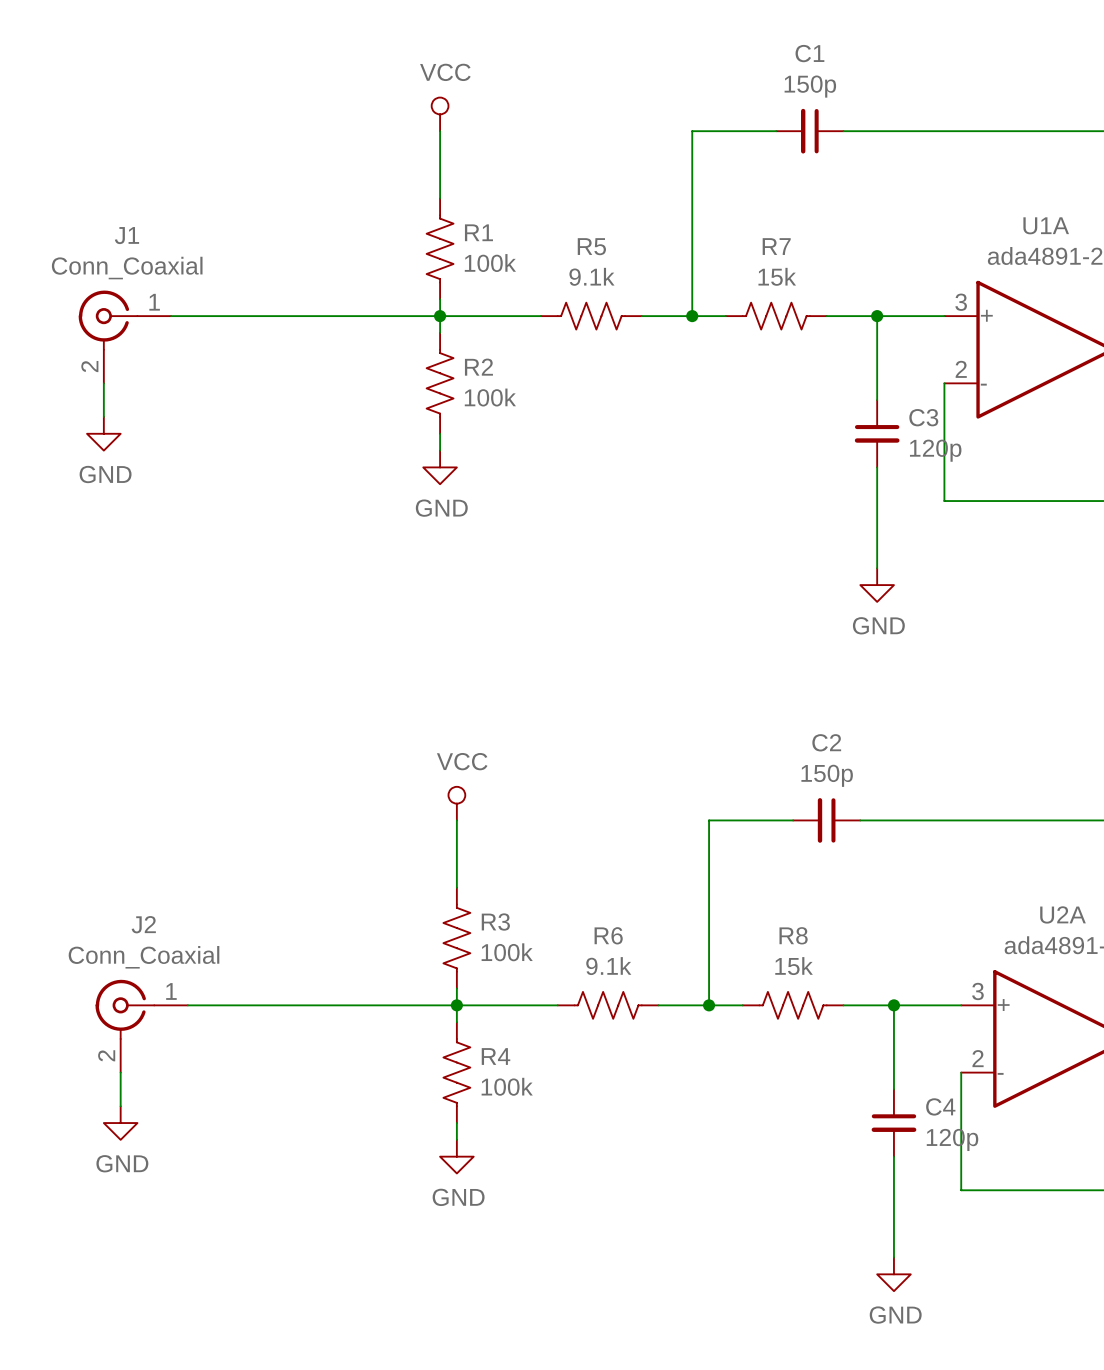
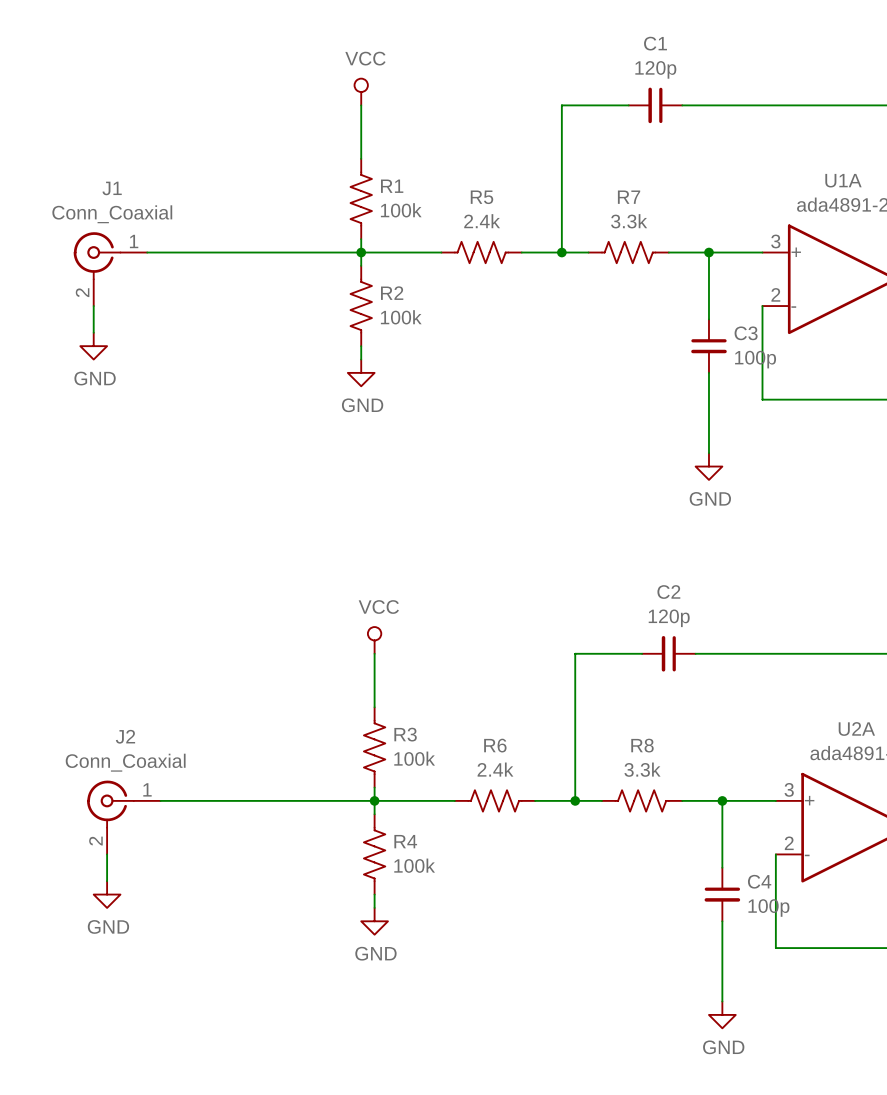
C1 value: 150p (810, 86) -> 120p (655, 69)
R5 value: 9.1k (591, 276) -> 2.4k (482, 221)
R7 value: 15k (777, 276) -> 3.3k (629, 221)
C3 value: 120p (935, 450) -> 100p (755, 359)
C2 value: 150p (827, 775) -> 120p (669, 618)
R6 value: 9.1k (608, 966) -> 2.4k (495, 769)
R8 value: 15k (794, 966) -> 3.3k (642, 769)
C4 value: 120p (952, 1139) -> 100p (768, 908)

